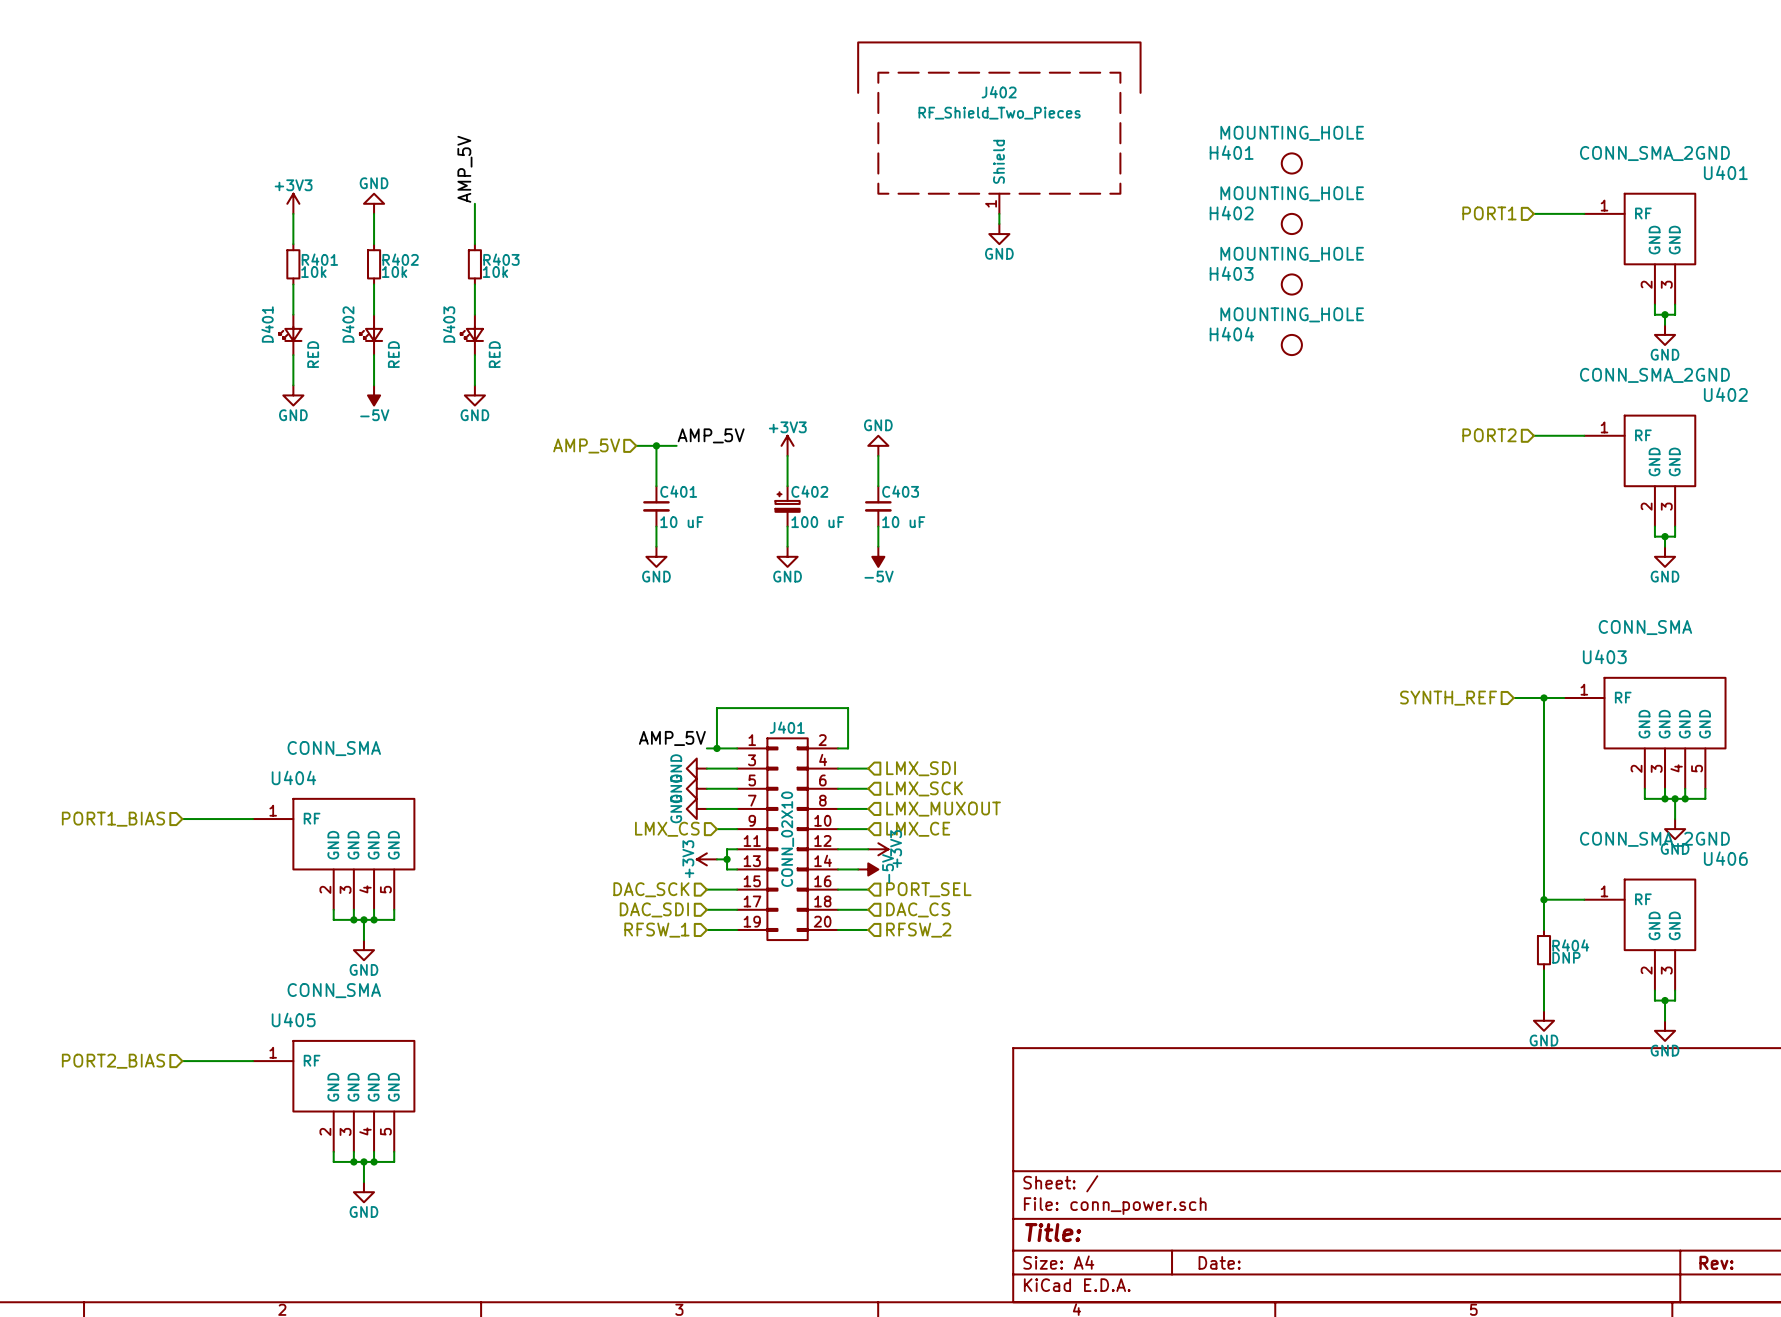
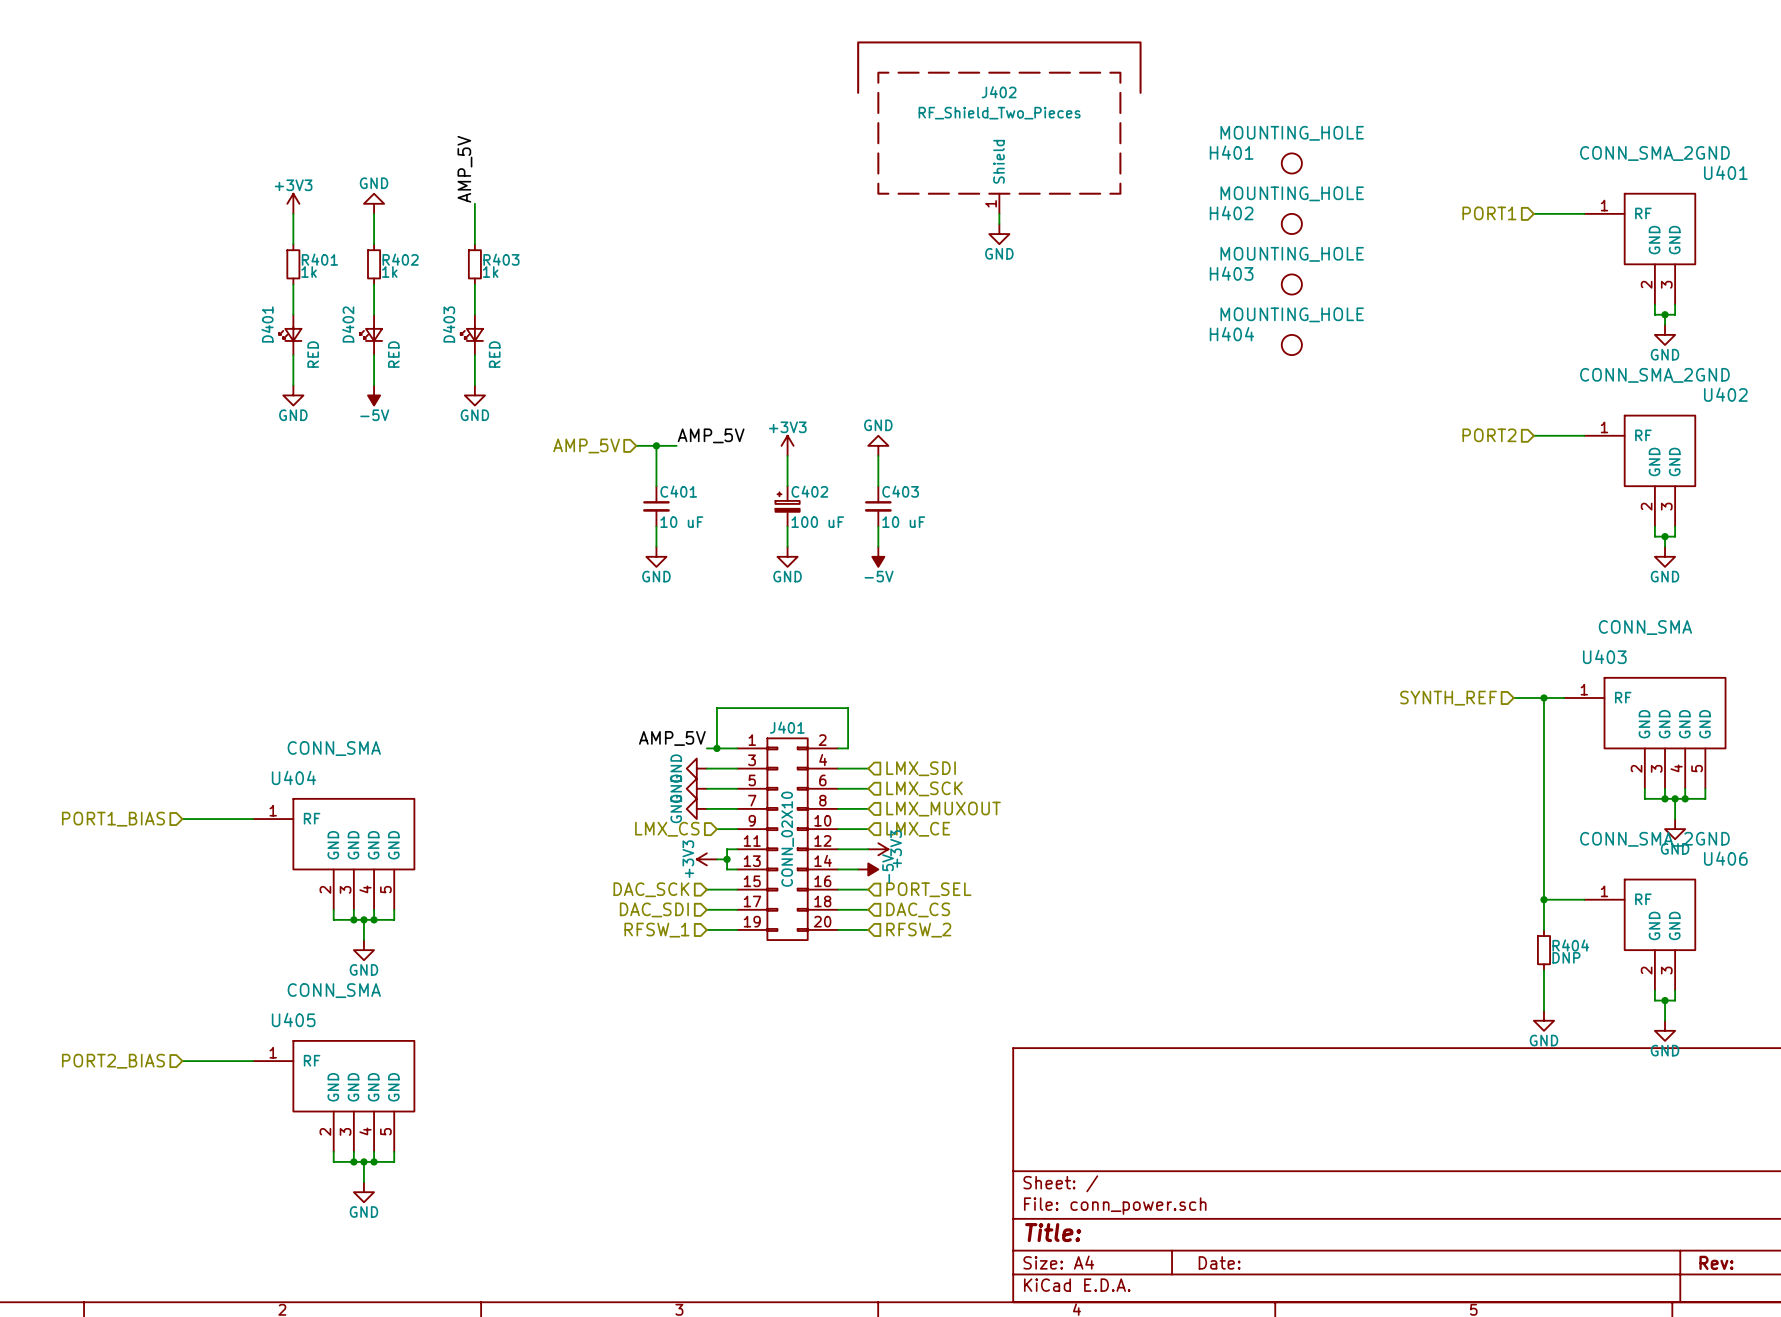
R401 value: 10k (313, 272) -> 1k (309, 272)
R402 value: 10k (394, 272) -> 1k (389, 272)
R403 value: 10k (495, 272) -> 1k (490, 272)

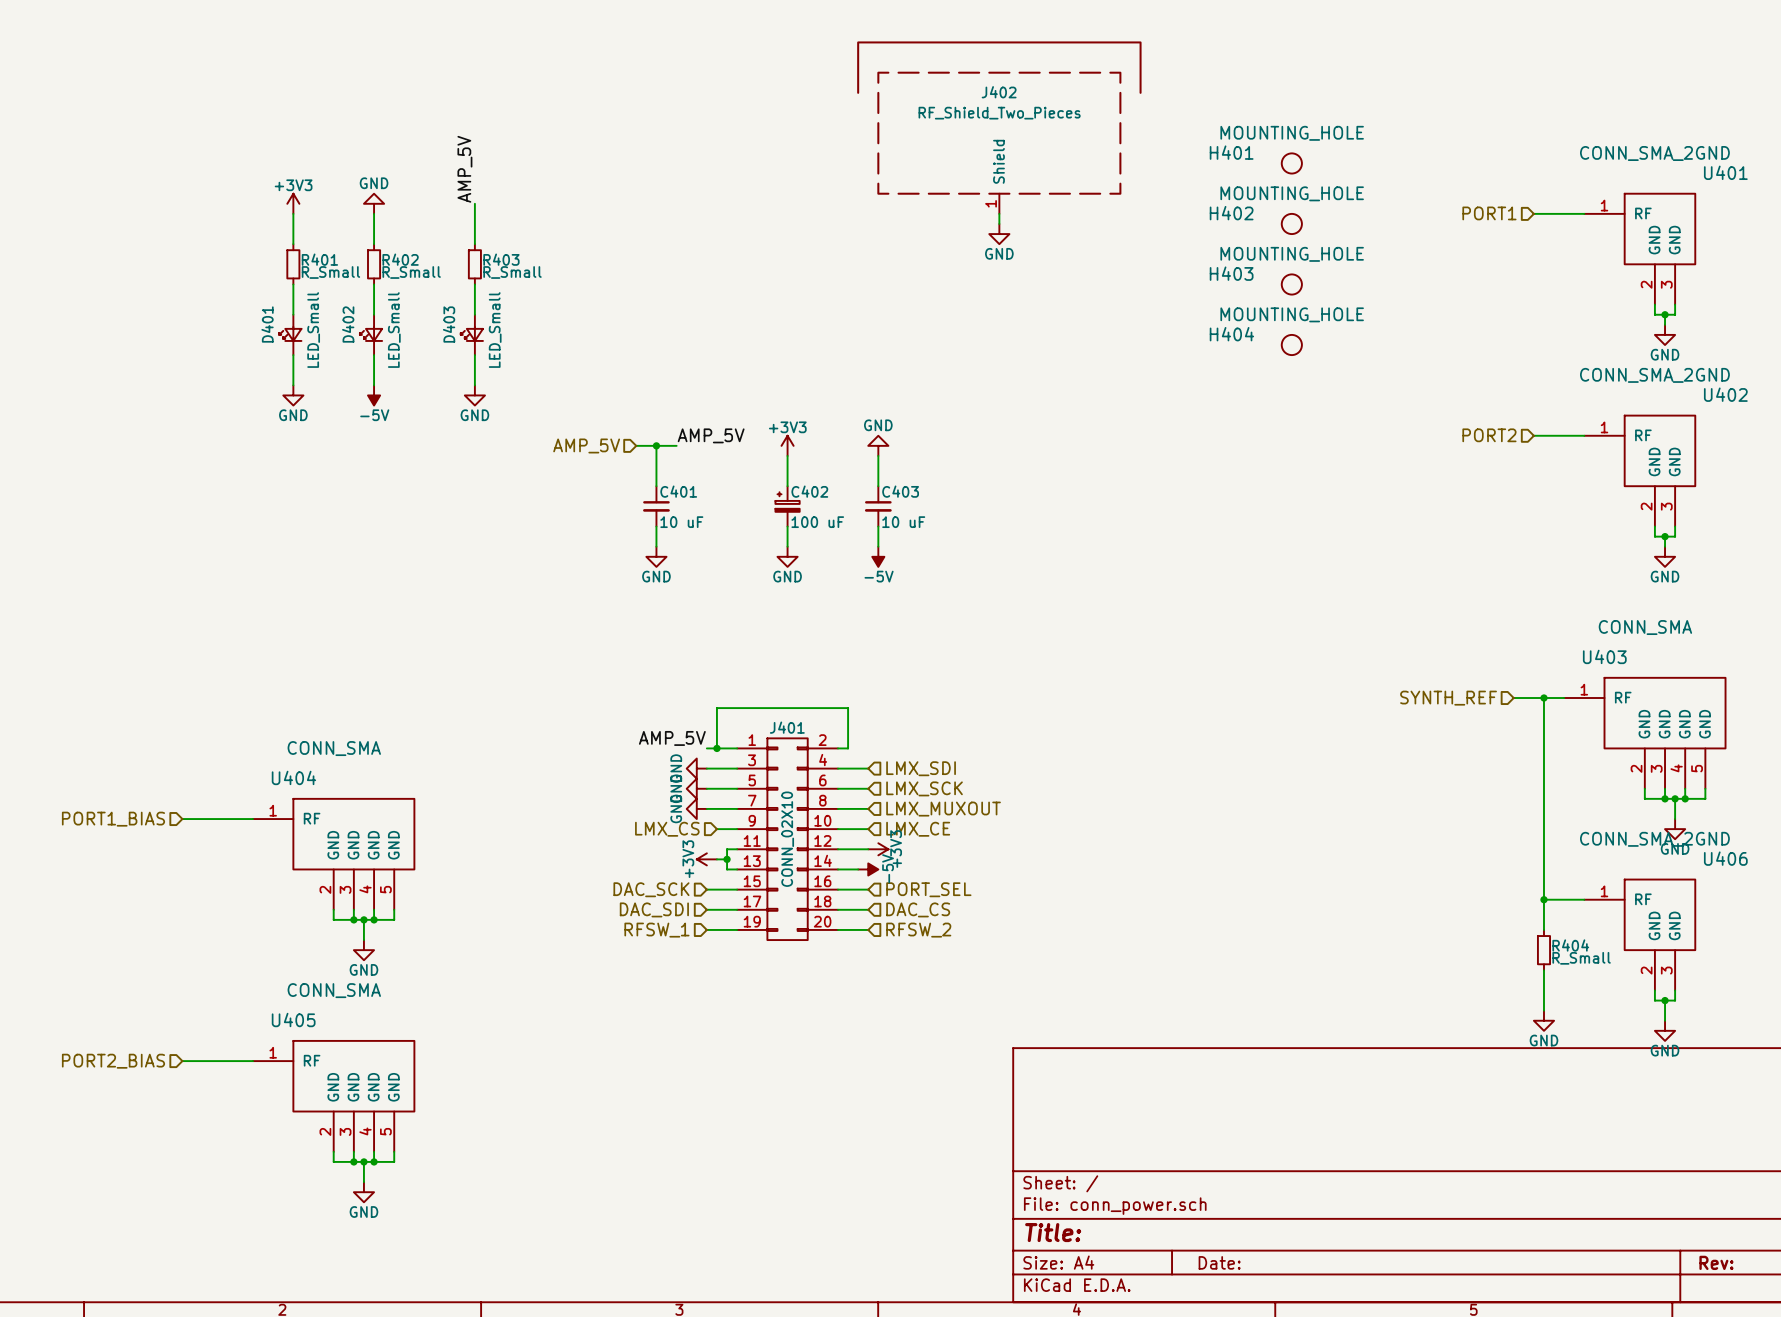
R401 value: 1k (309, 272) -> R_Small (330, 272)
R402 value: 1k (389, 272) -> R_Small (411, 272)
R403 value: 1k (490, 272) -> R_Small (512, 272)
D401 value: RED (313, 354) -> LED_Small (313, 330)
D402 value: RED (393, 354) -> LED_Small (394, 330)
D403 value: RED (494, 354) -> LED_Small (495, 330)
R404 value: DNP (1566, 957) -> R_Small (1581, 958)

